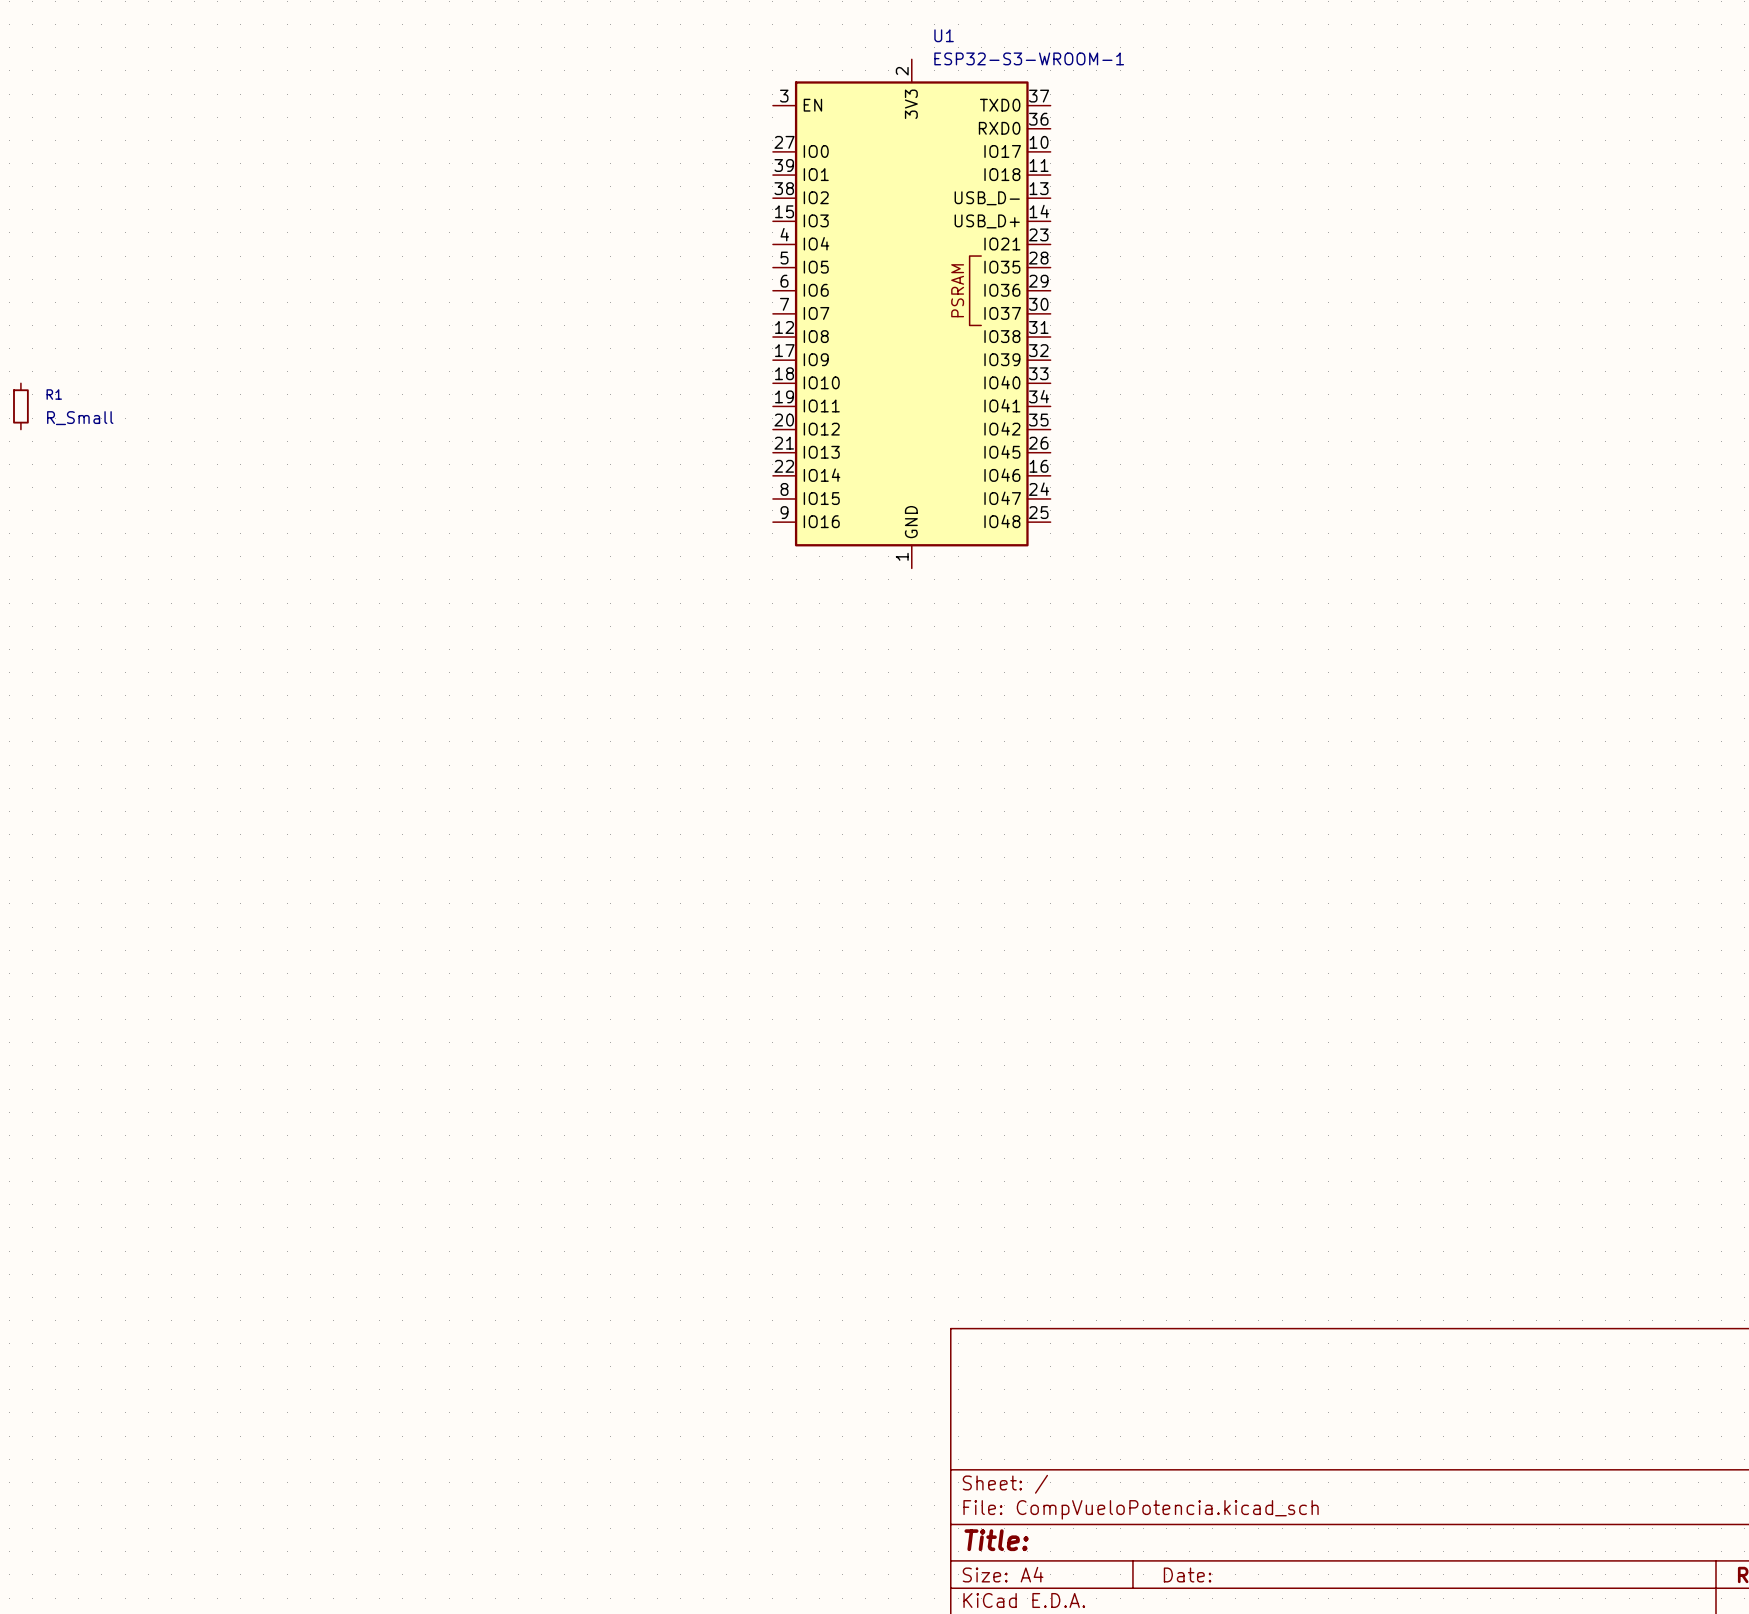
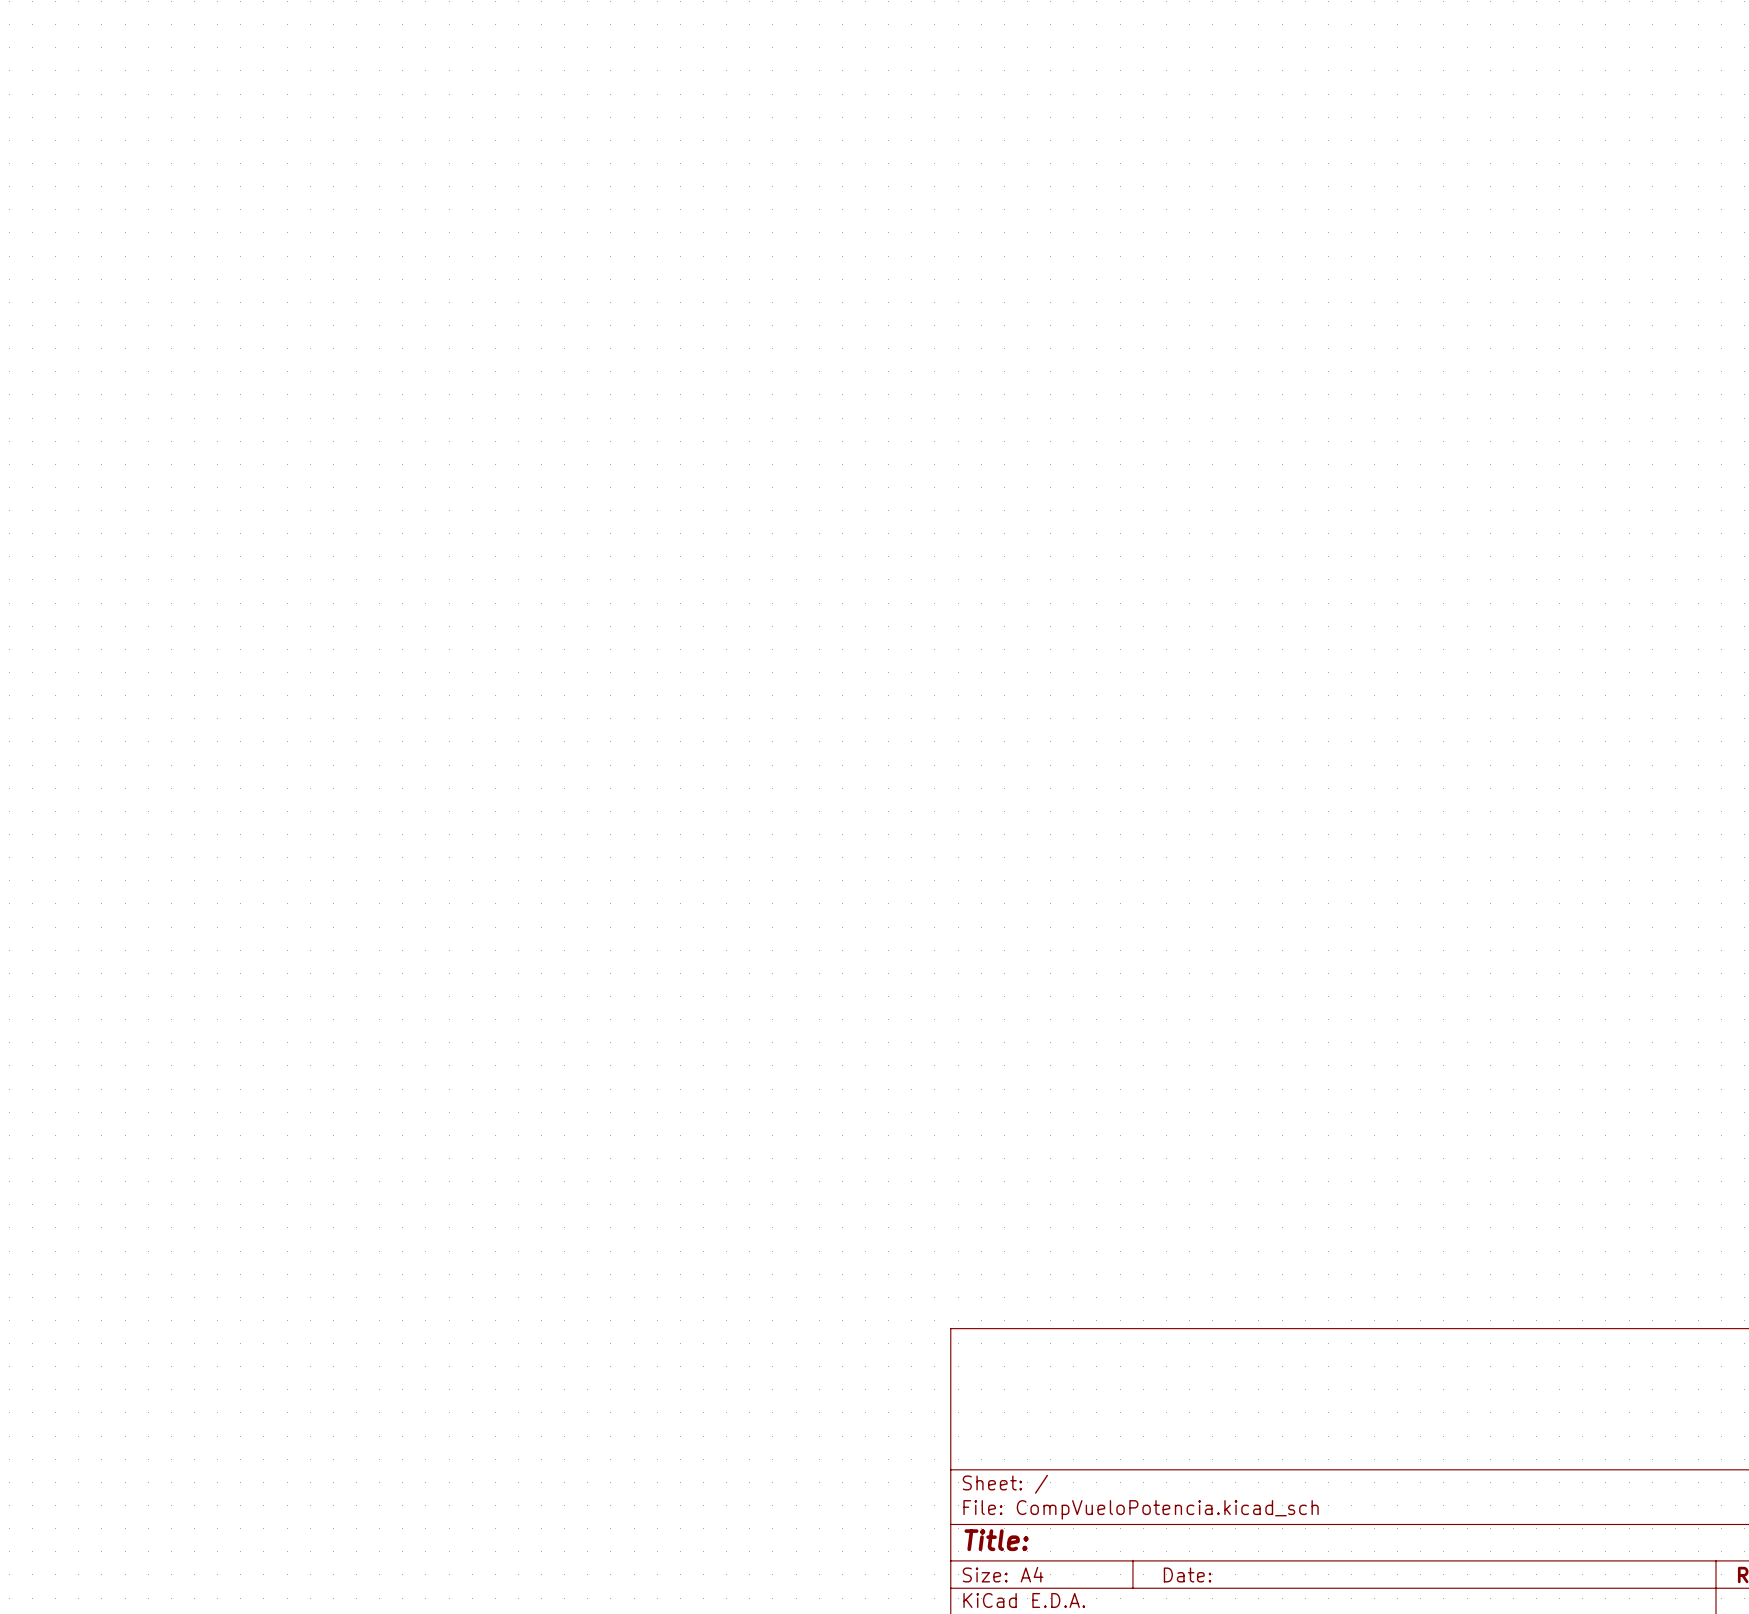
U1: ESP32-S3-WROOM-1 (911, 313) -> none
R1: R_Small (20, 406) -> none

